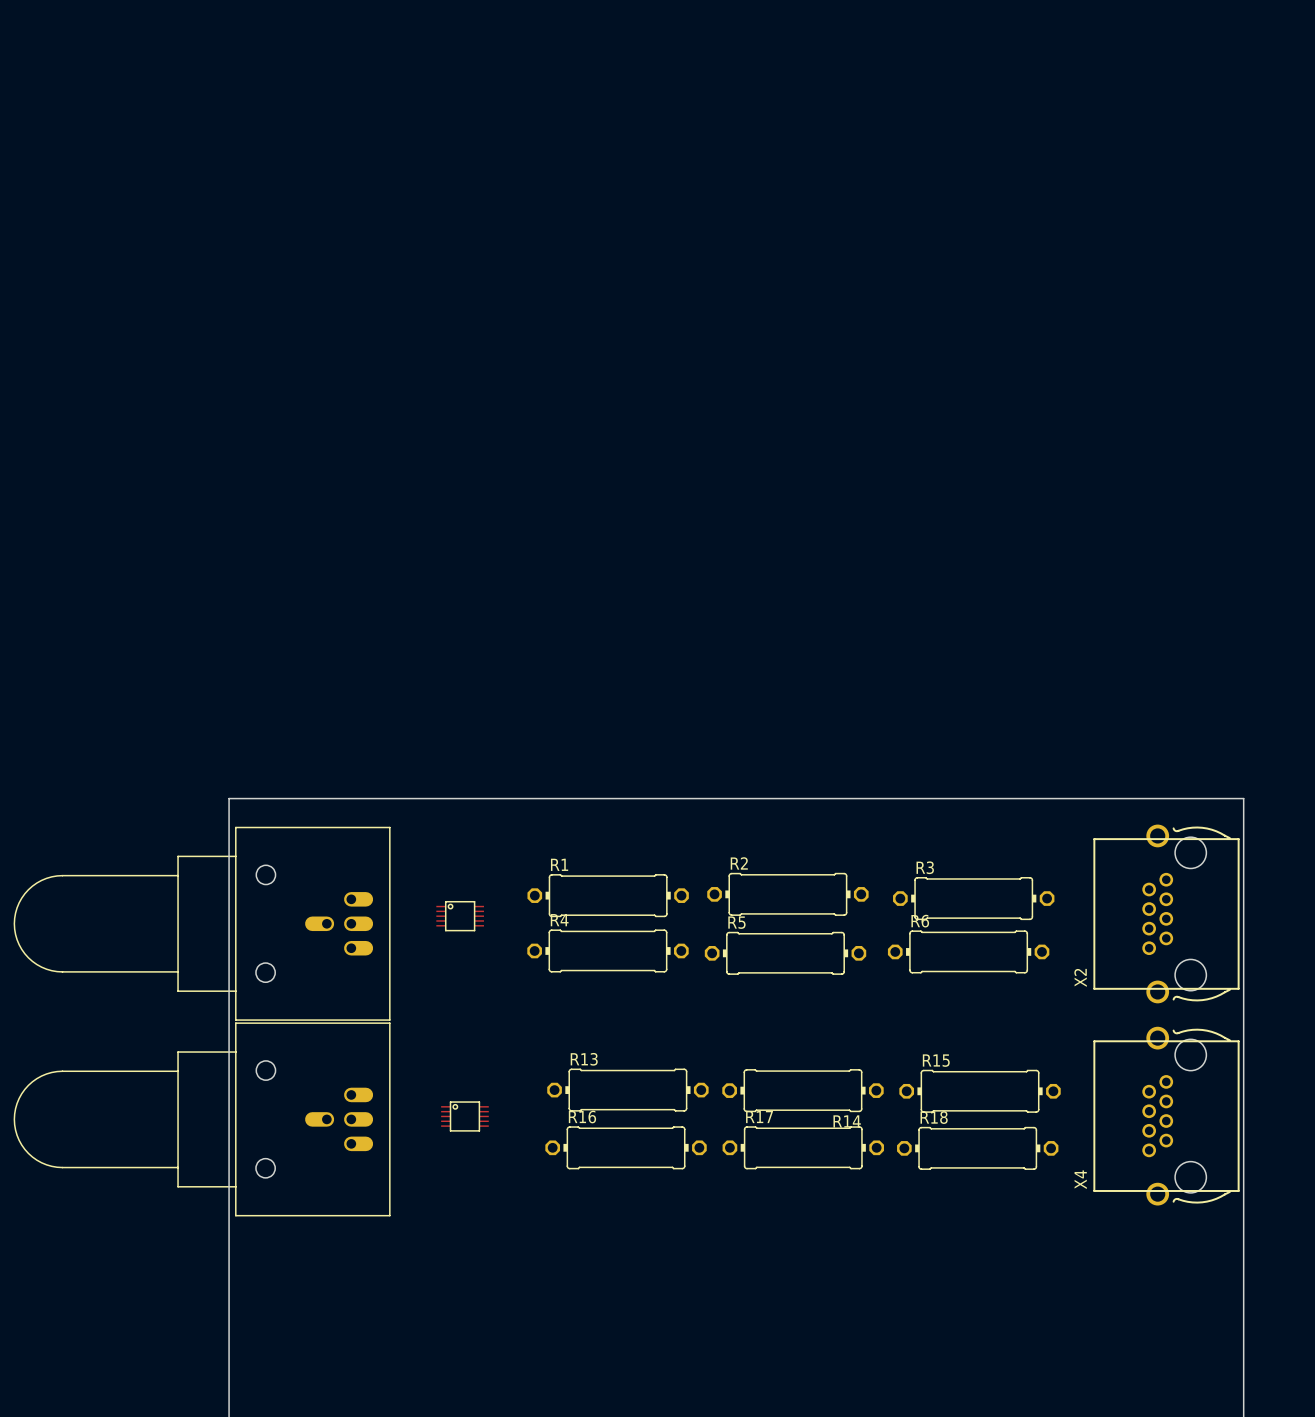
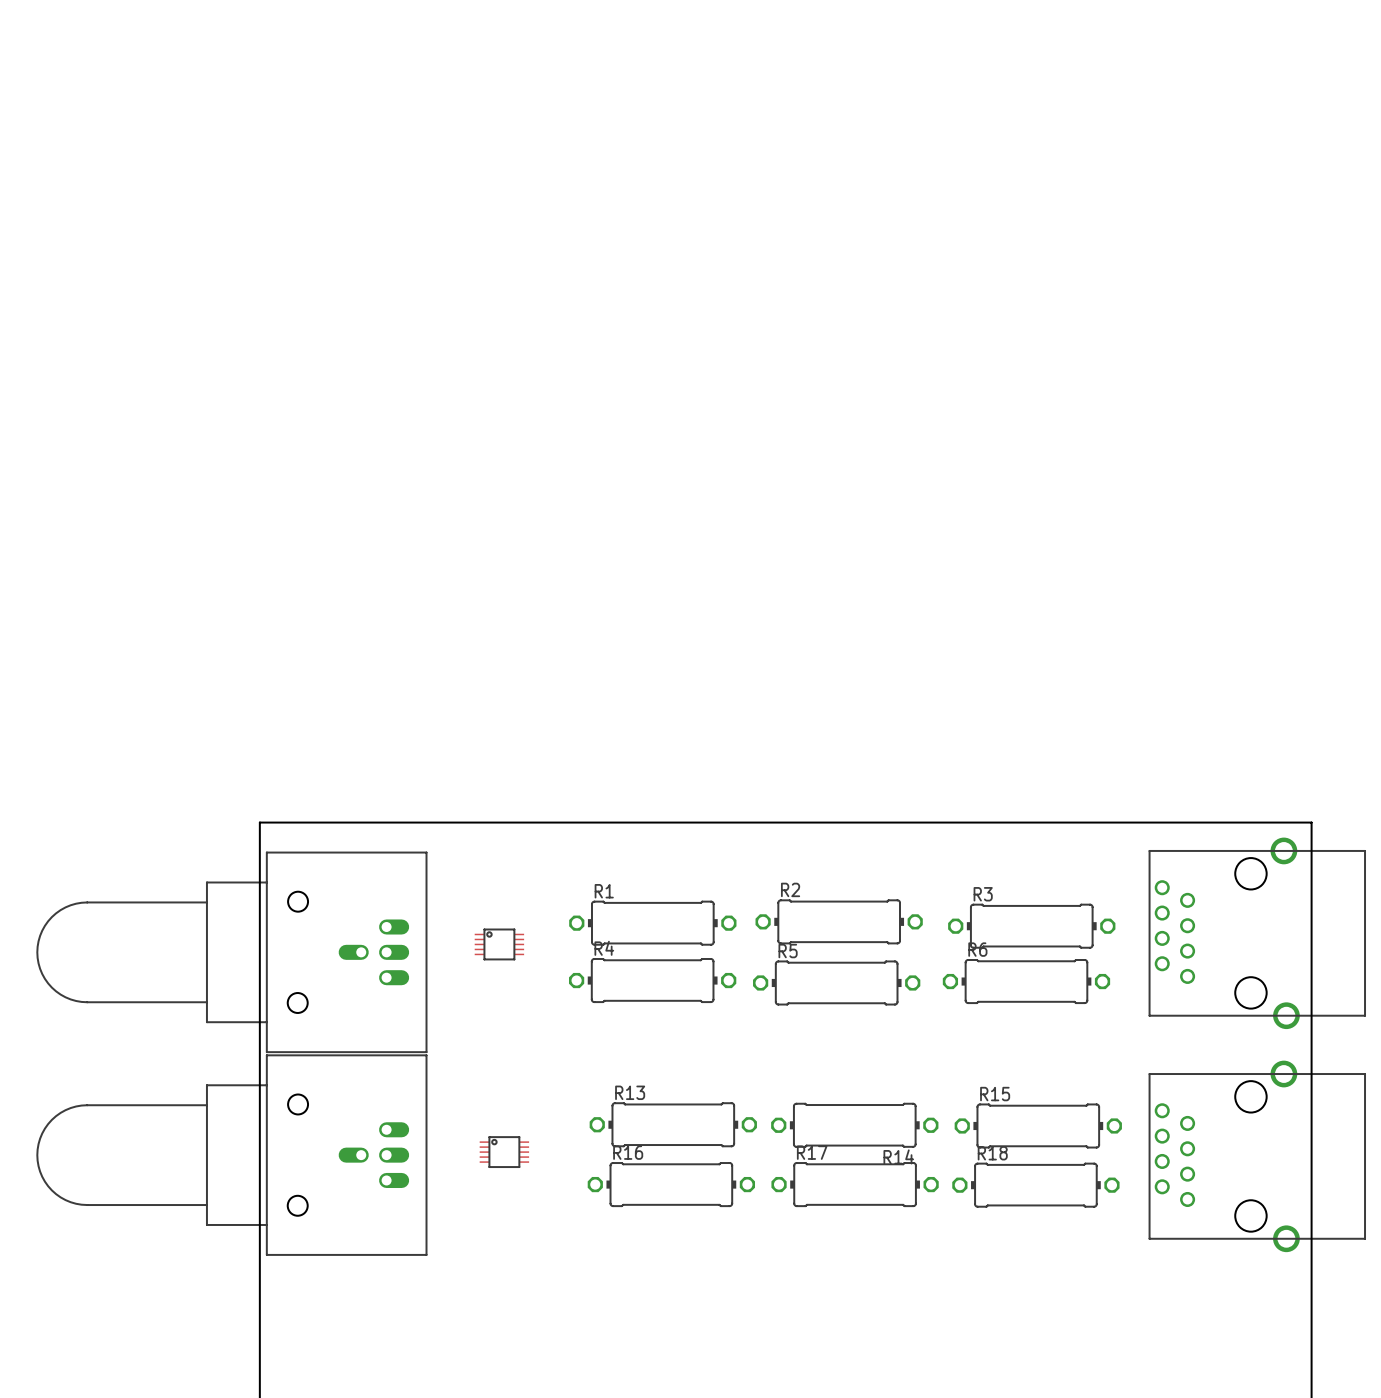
part: none -> (1257, 933)
X2: (1166, 913) -> none
X4: (1166, 1116) -> none
part: none -> (1257, 1156)

